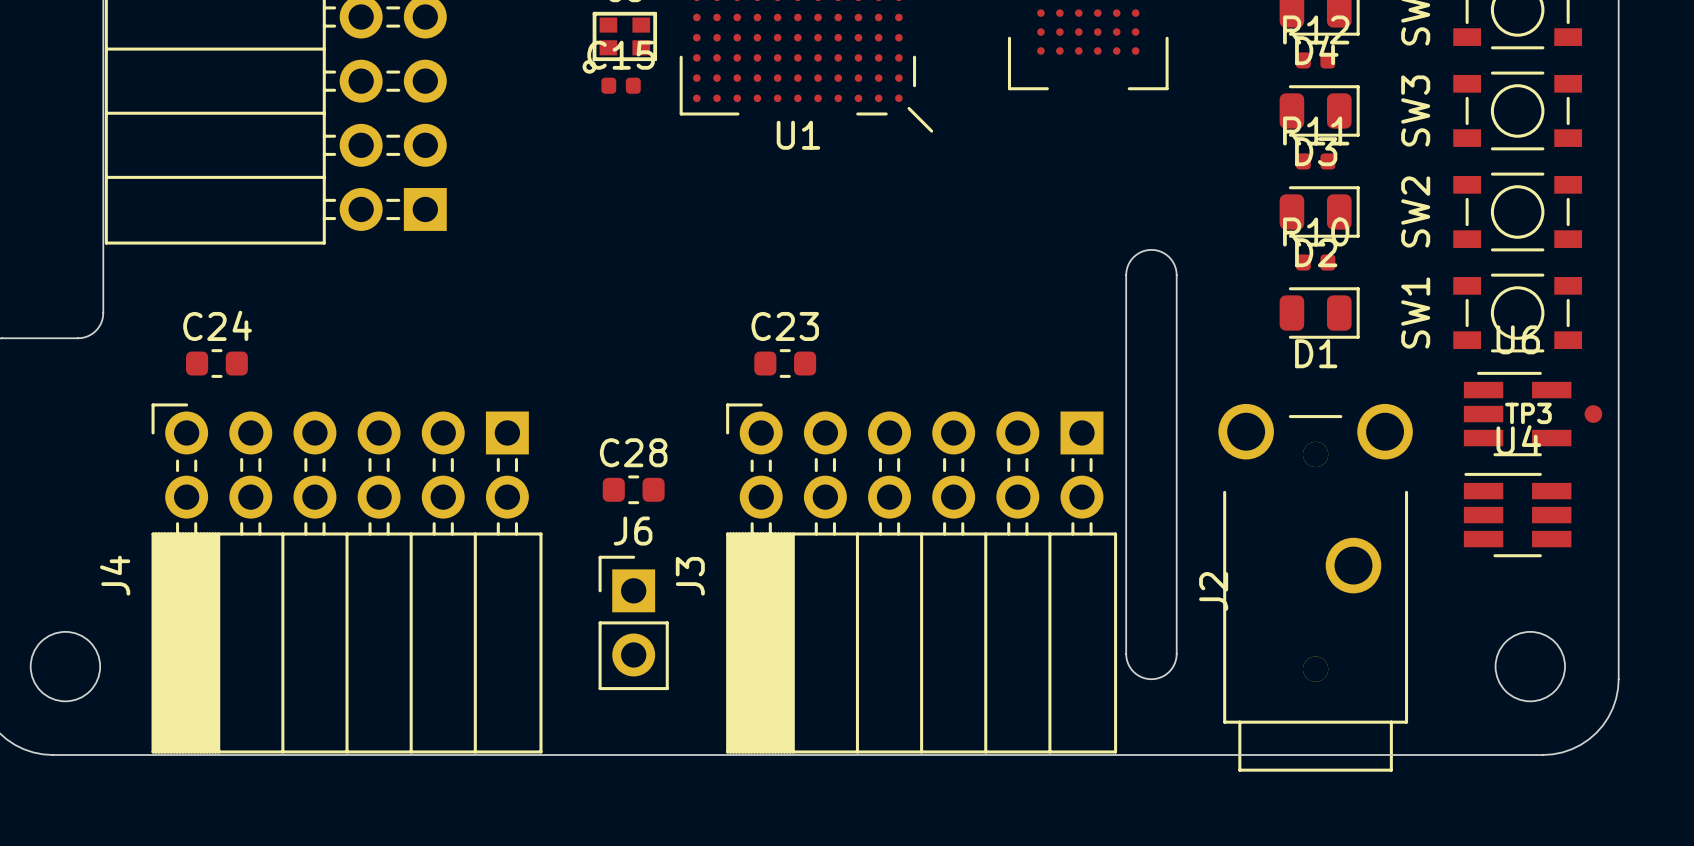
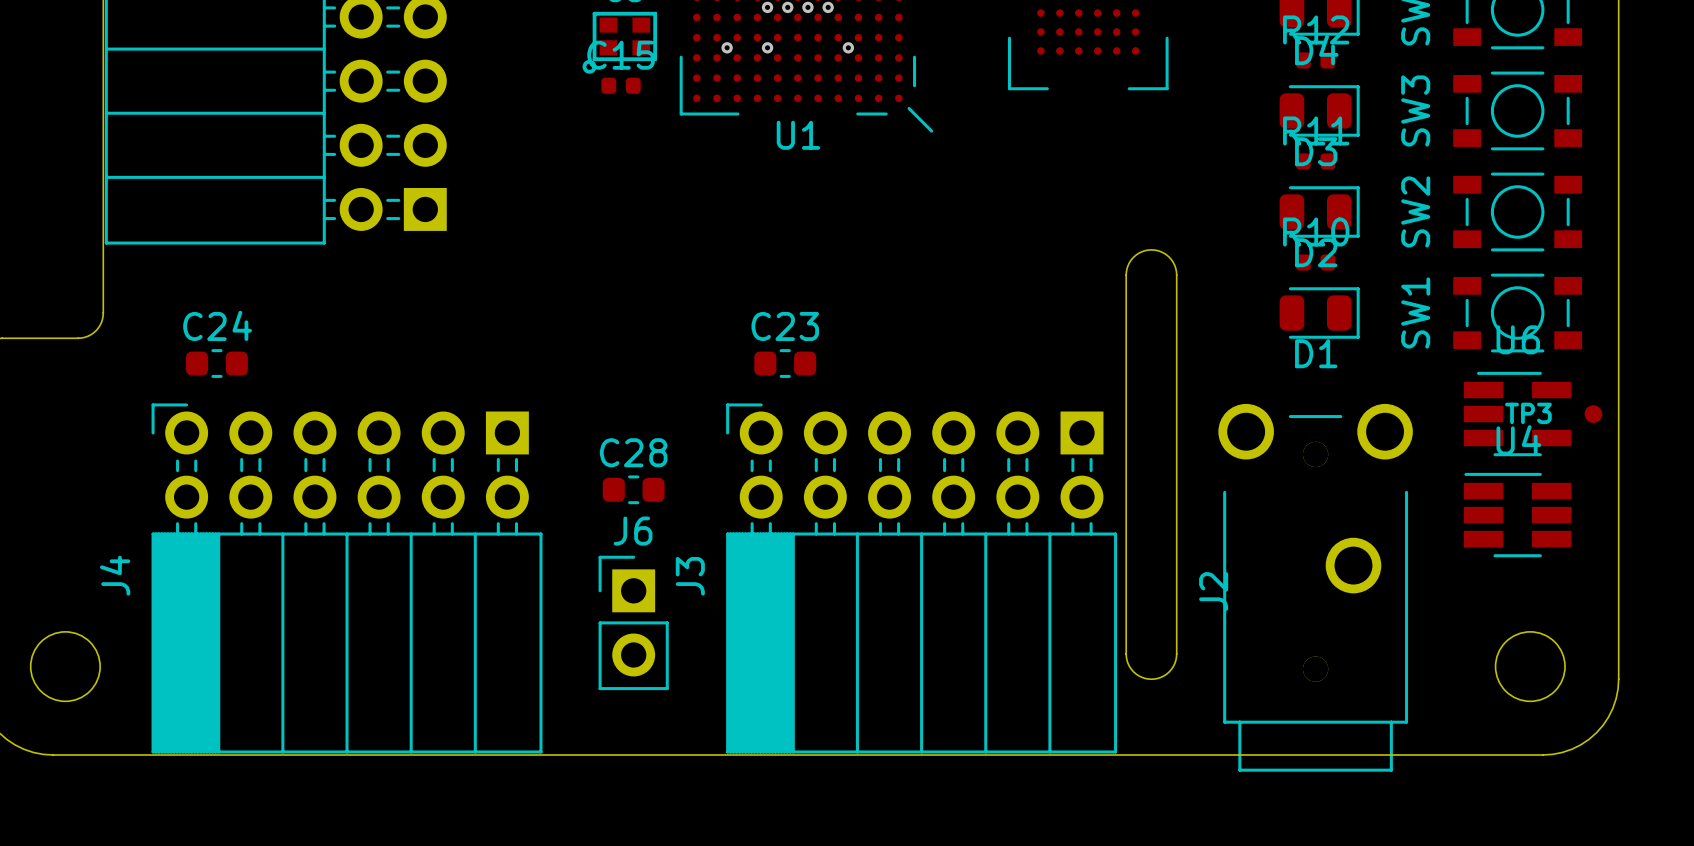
via: none -> (767, 7)
via: none -> (787, 7)
via: none -> (807, 7)
via: none -> (828, 7)
via: none -> (727, 47)
via: none -> (767, 47)
via: none -> (848, 47)

